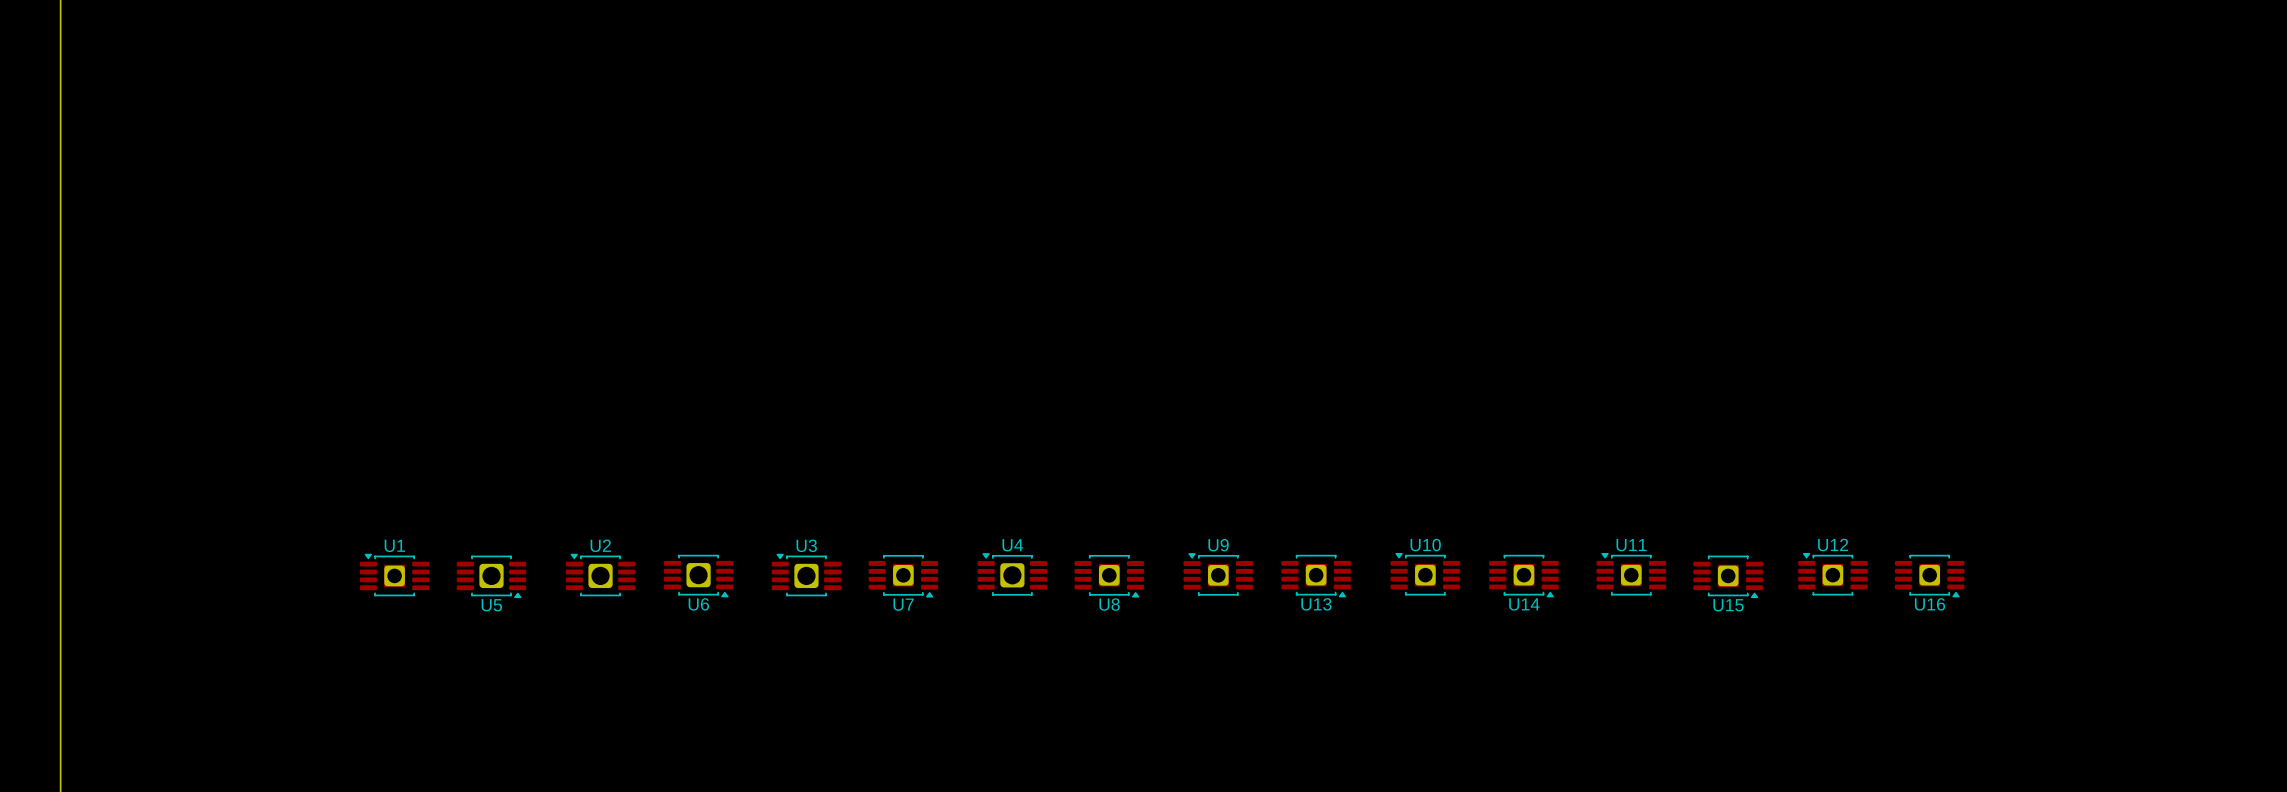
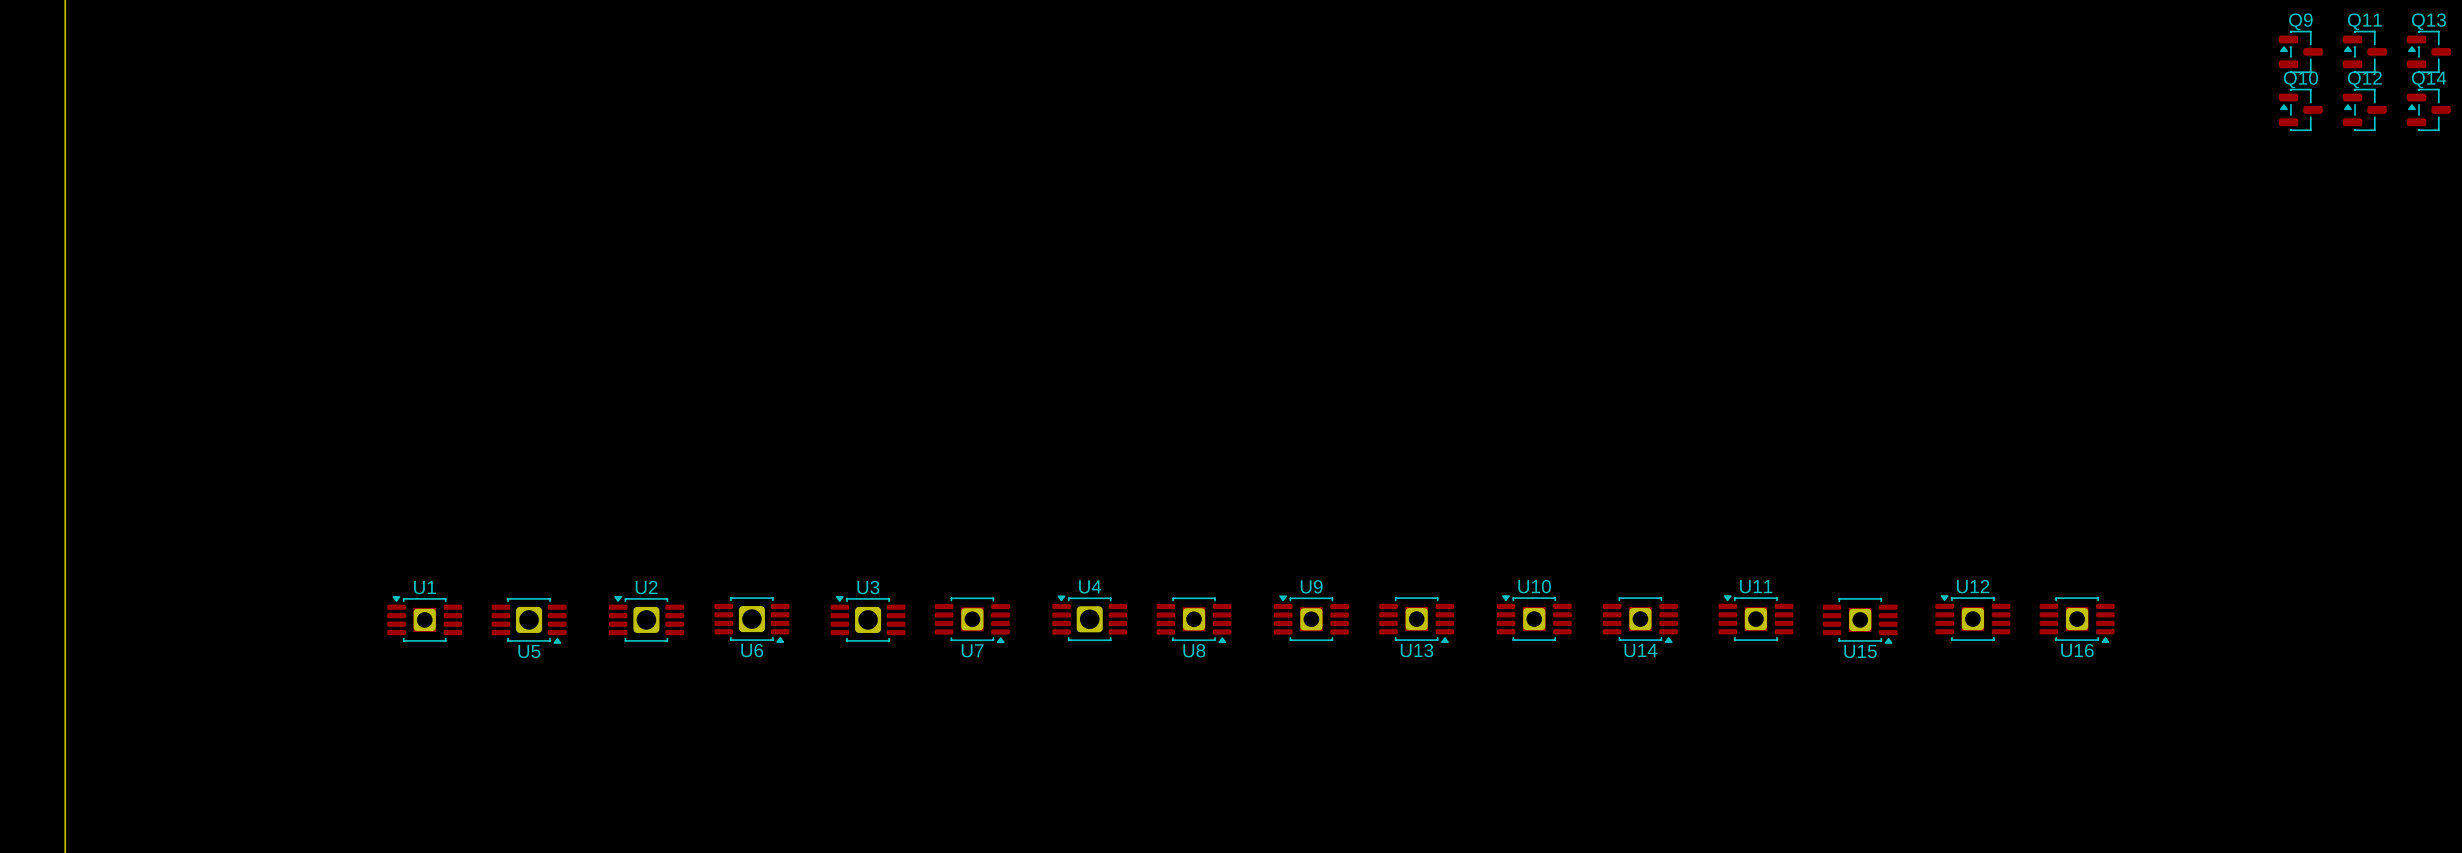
Q9: none -> (2300, 51)
Q11: none -> (2364, 51)
Q13: none -> (2428, 51)
Q10: none -> (2300, 109)
Q12: none -> (2364, 109)
Q14: none -> (2428, 109)

